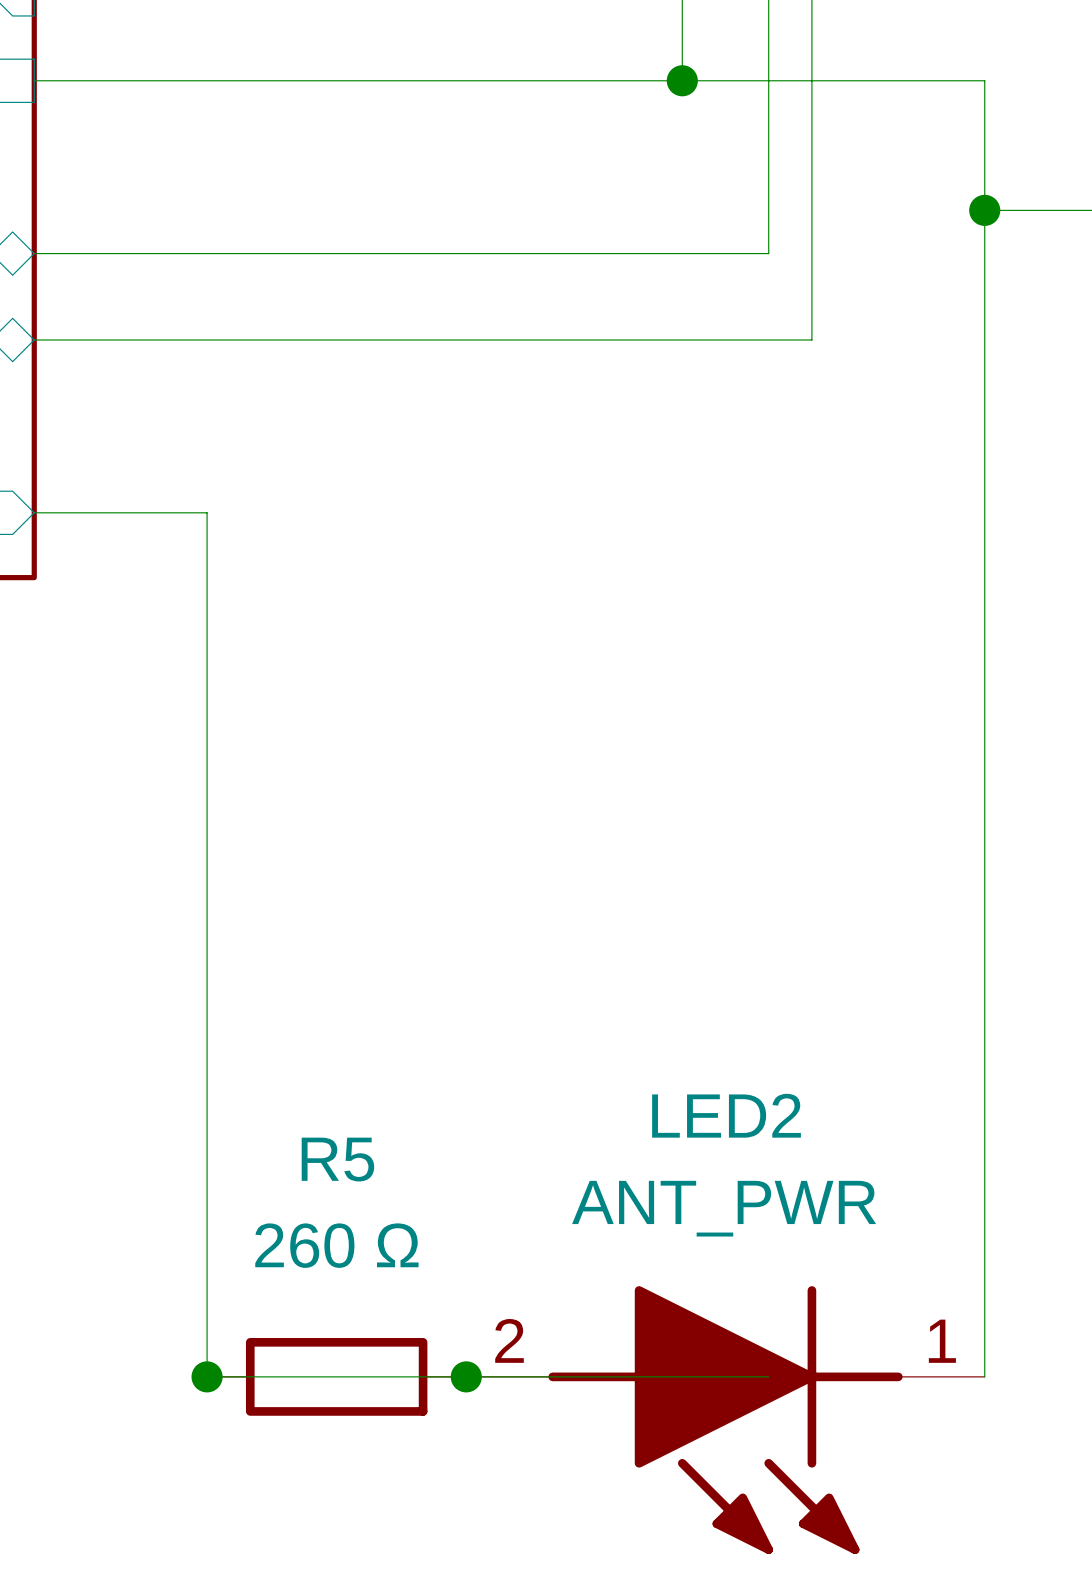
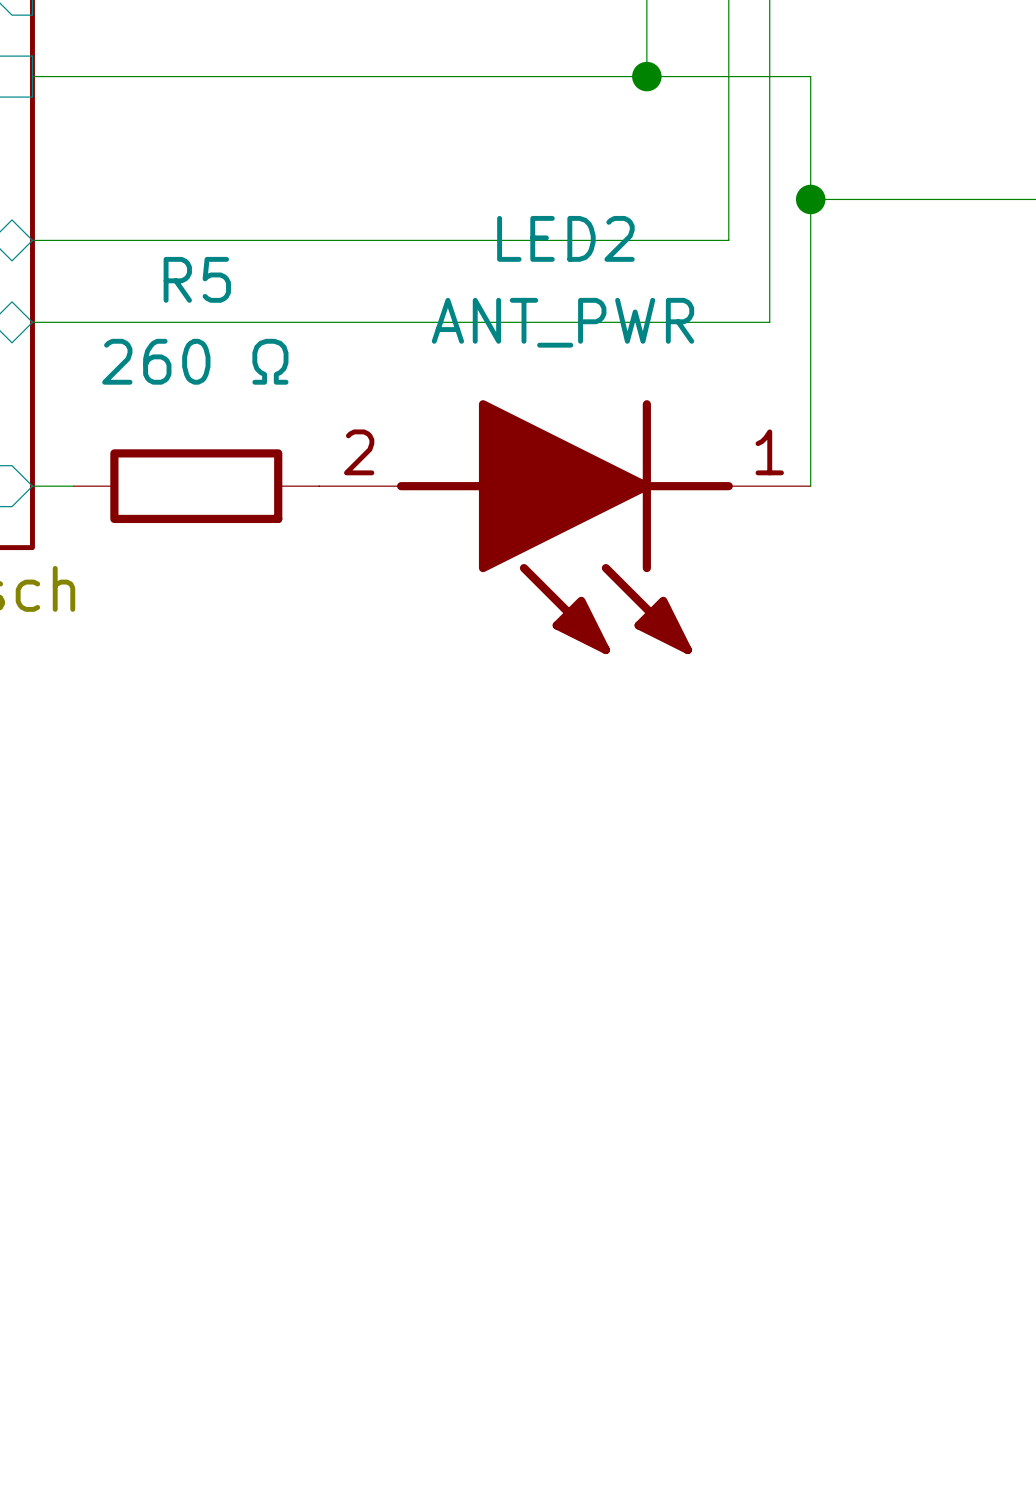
wire: (855, 80) (984, 80) (984, 1376) -> (810, 76) (810, 486)
wire: none -> (810, 199) (933, 199)
junction position: (984, 210) -> (810, 199)
wire: (77, 512) (207, 512) (207, 1376) (768, 1376) -> none
junction: (207, 1376) -> none
R5 position: (336, 1376) -> (196, 486)
junction: (466, 1376) -> none
LED2 position: (725, 1420) -> (564, 527)

